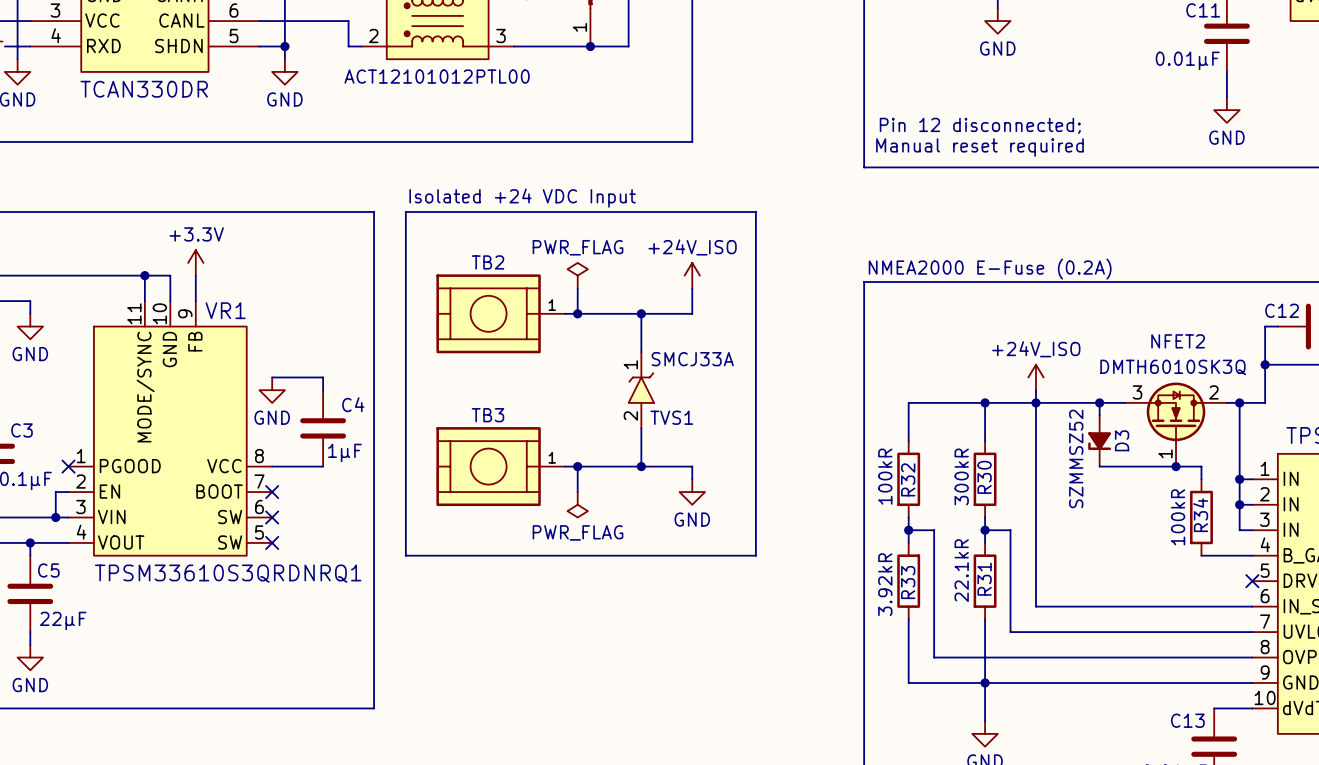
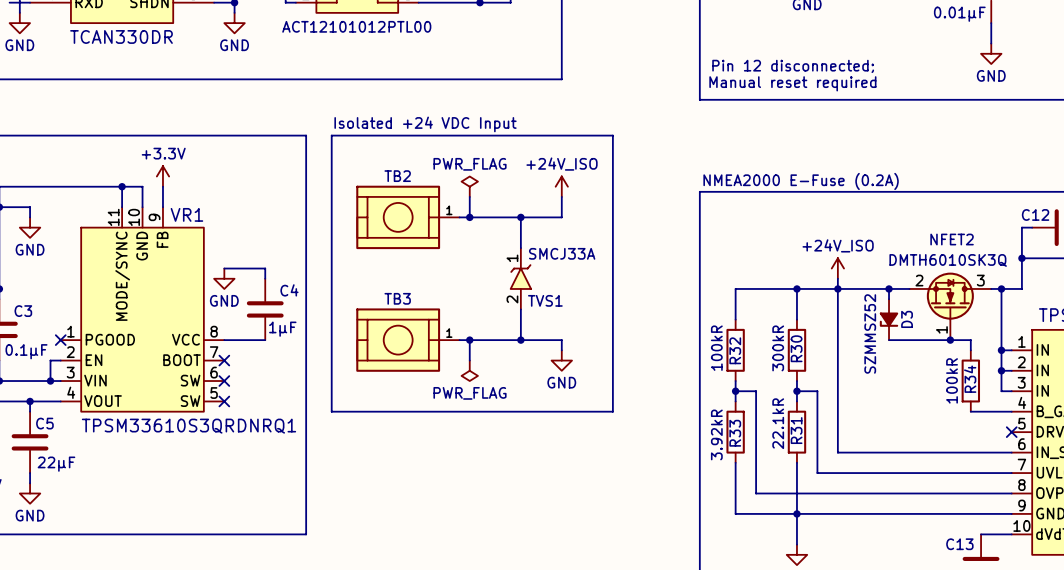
NFET2 pin number: 3 (1137, 392) -> 2 (919, 280)
NFET2 pin number: 2 (1213, 392) -> 3 (980, 280)

